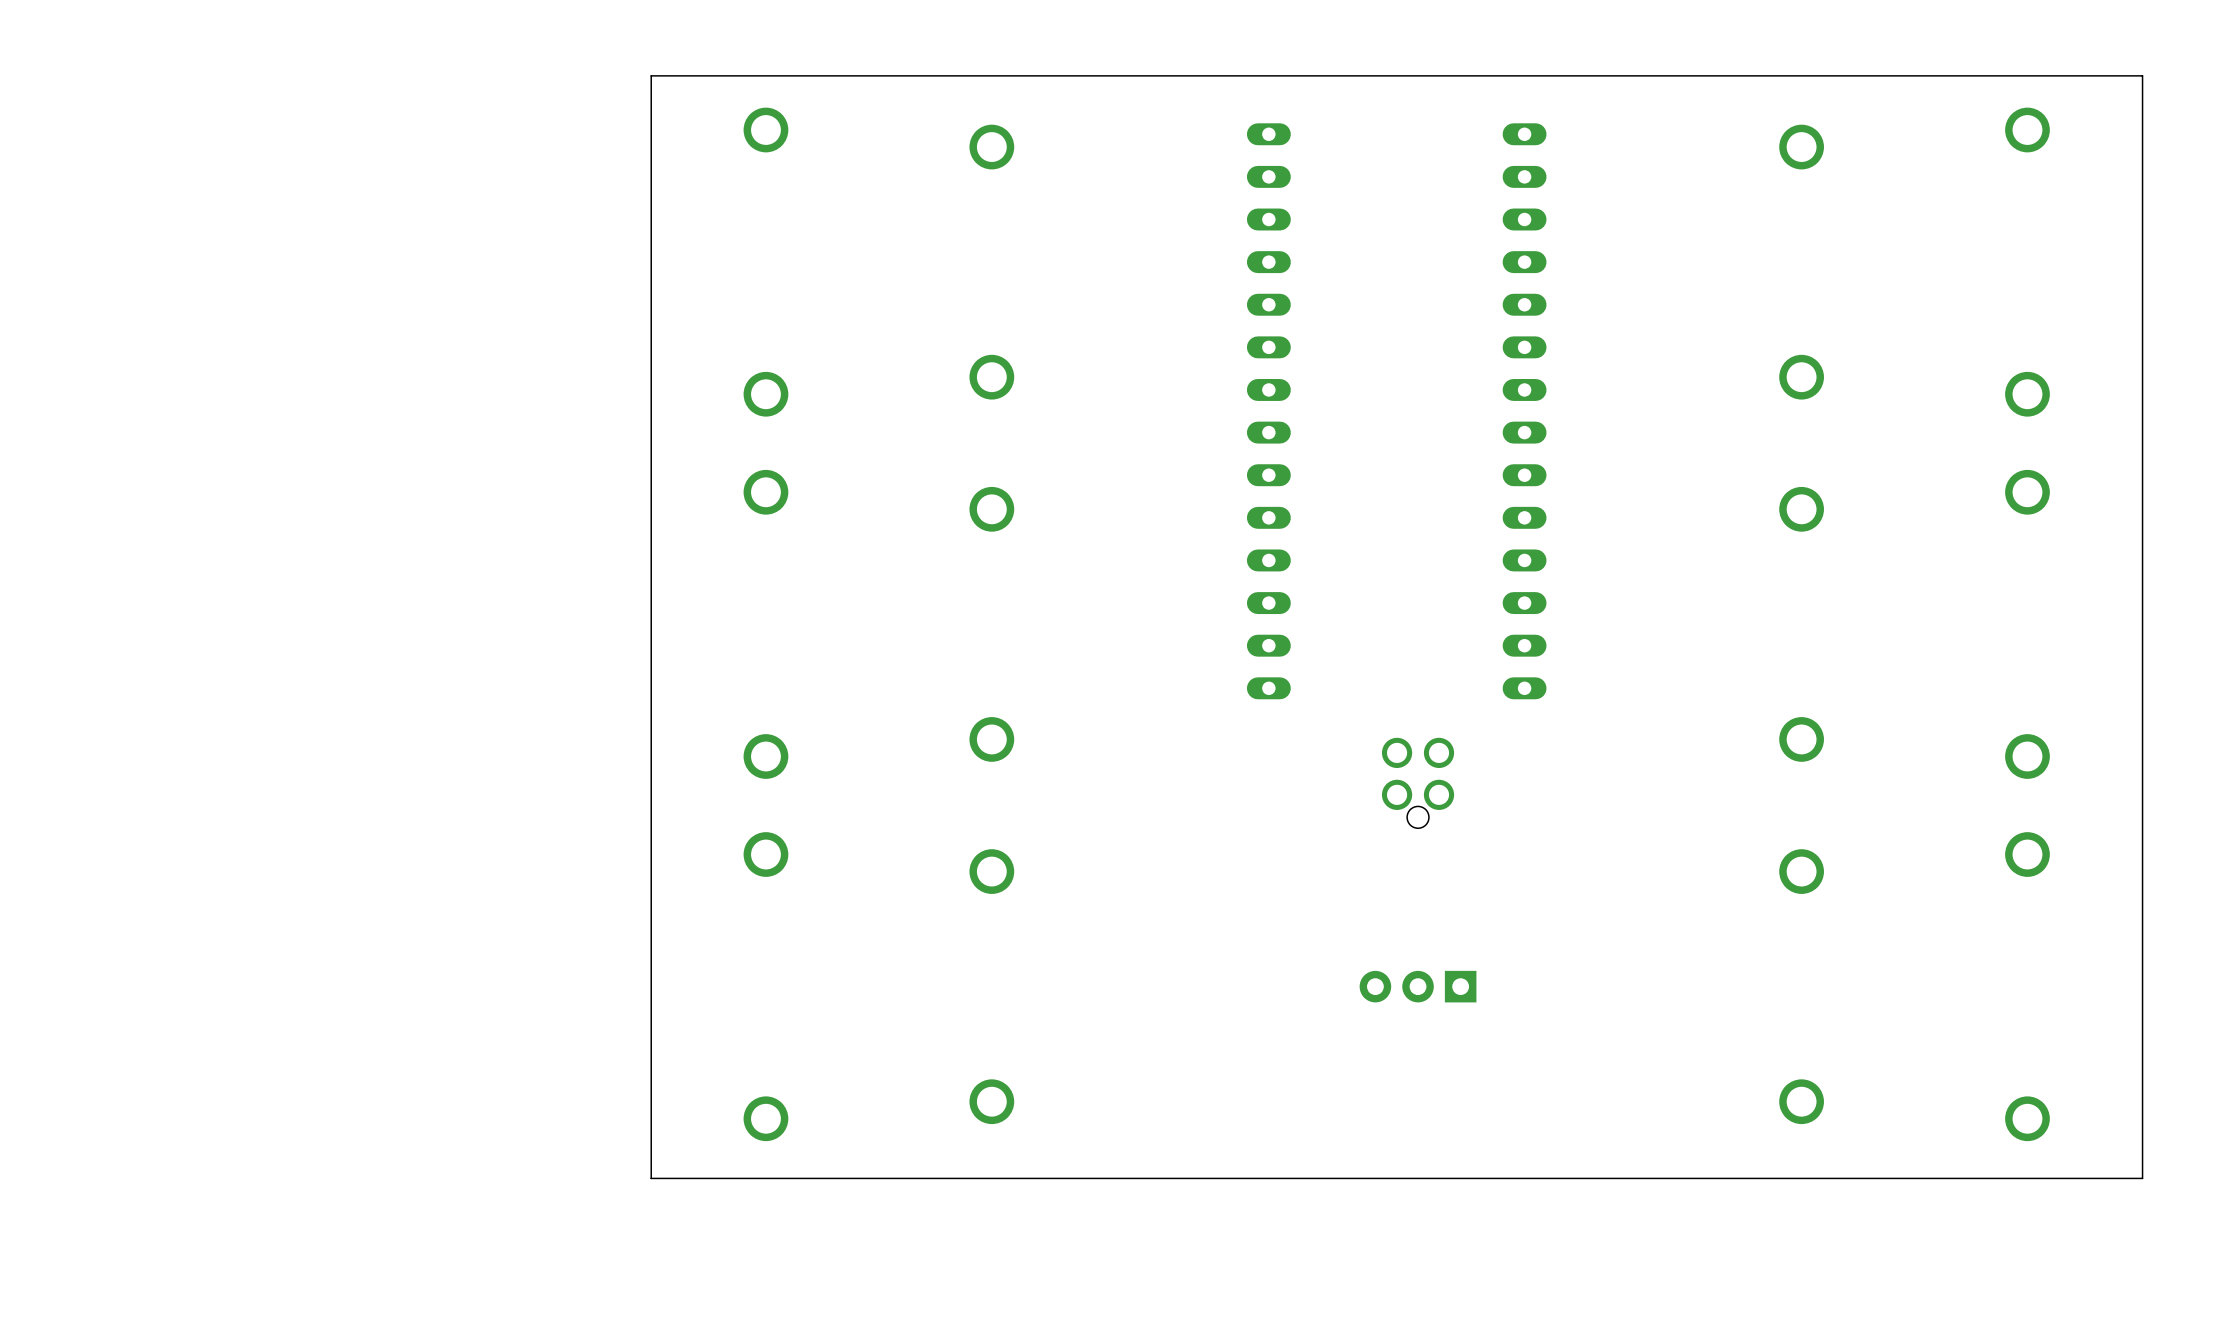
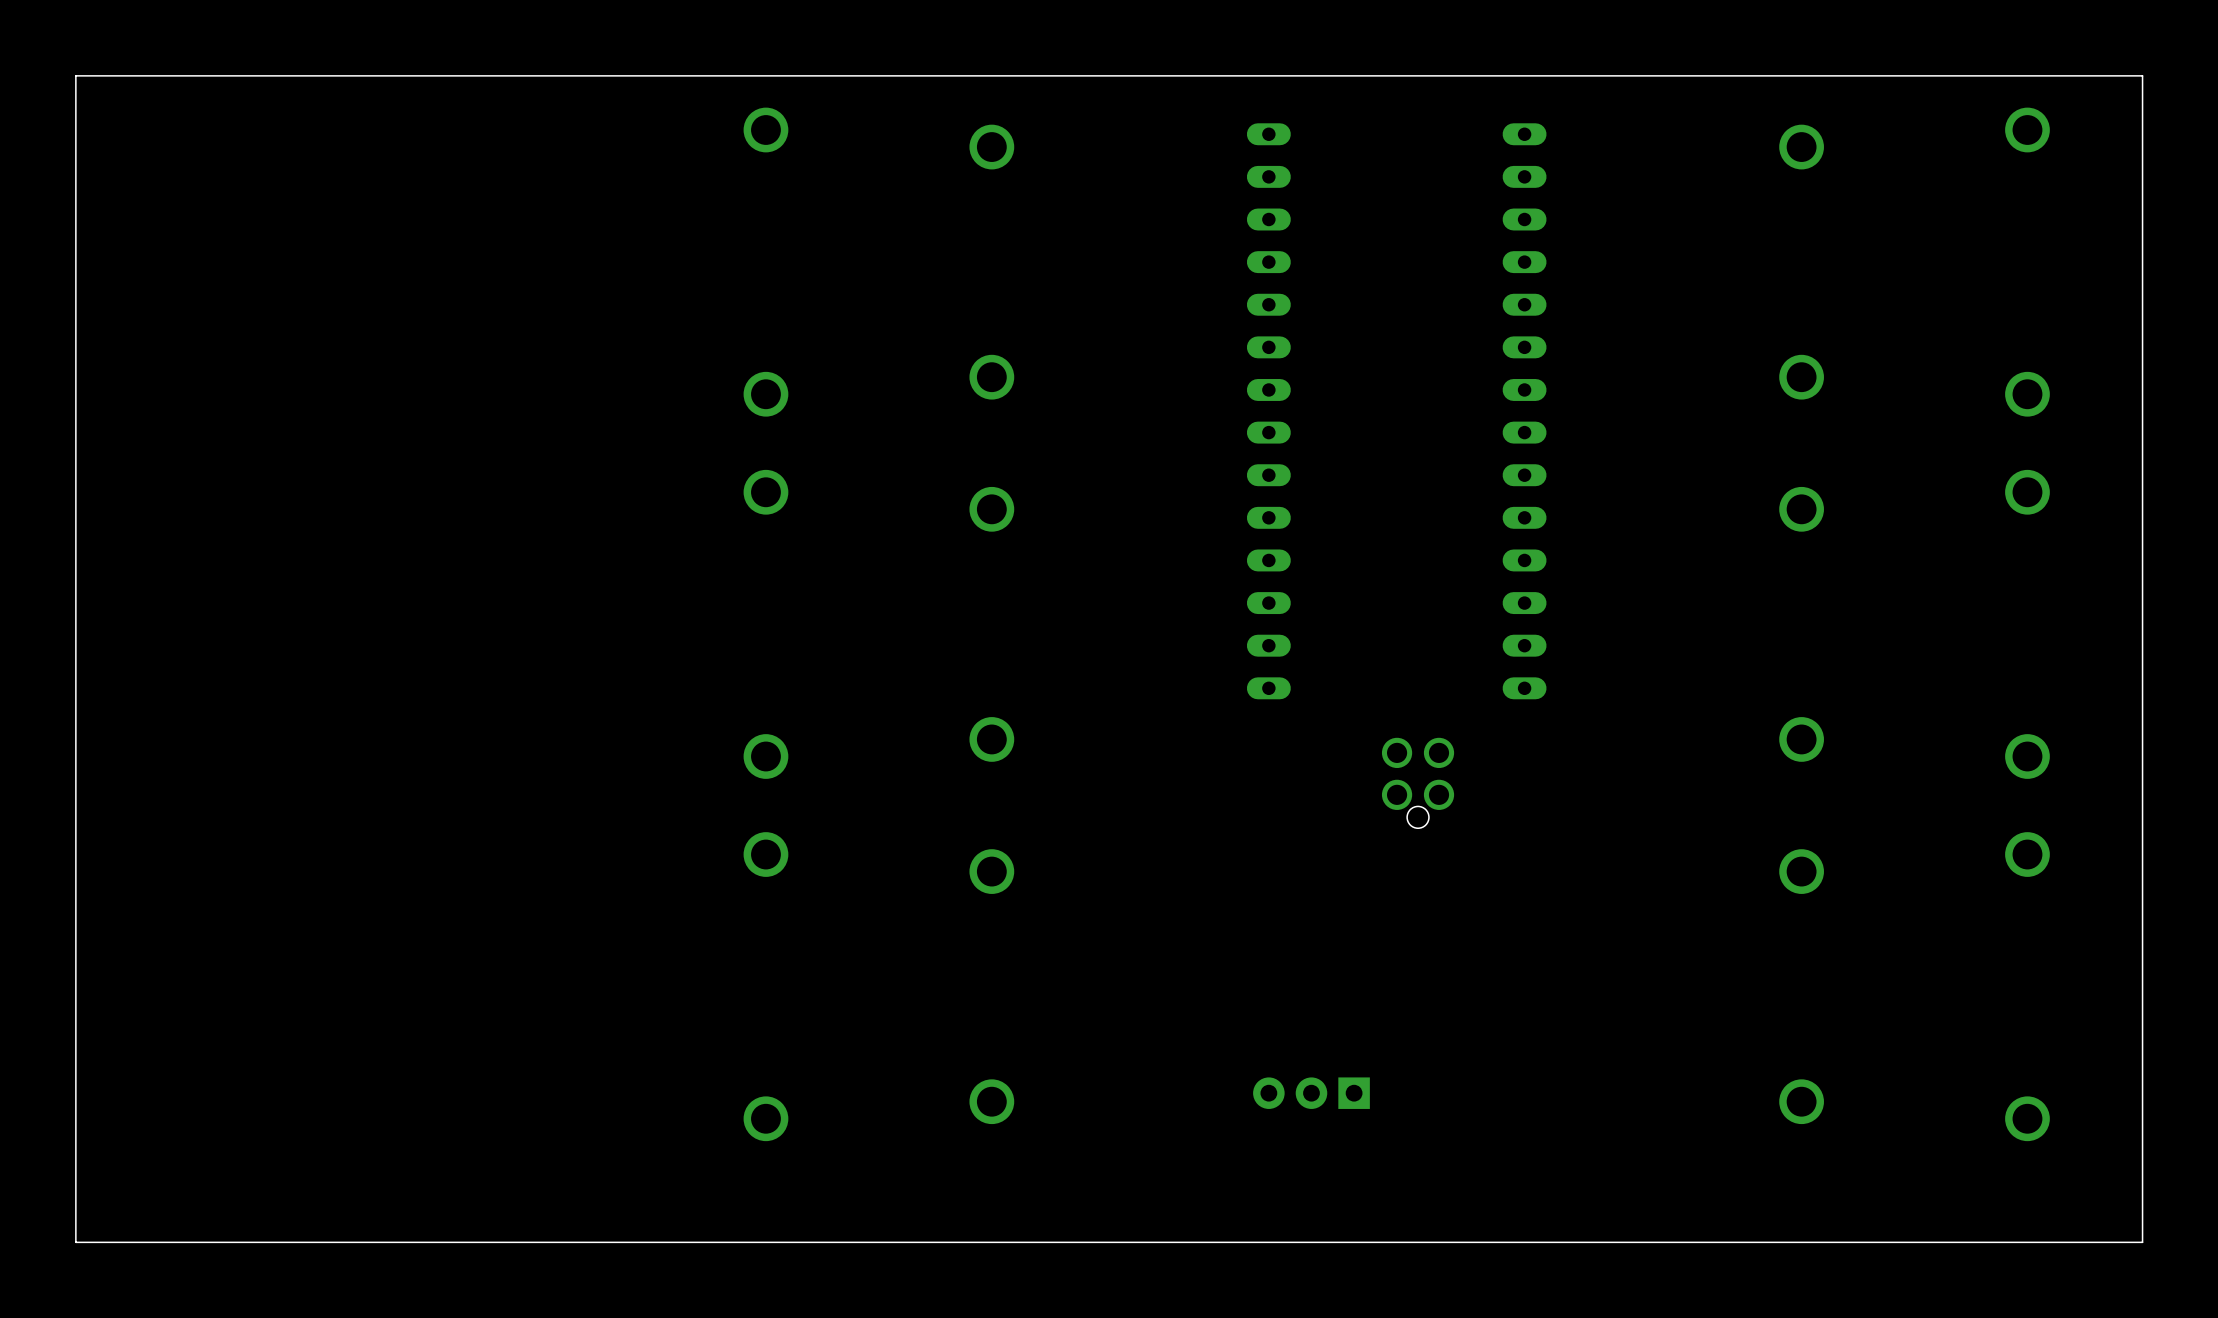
board edge: (651, 75) (651, 1178) (2142, 1178) -> (651, 75) (75, 75) (75, 1242) (2142, 1242) (2142, 1178)
part position: (1418, 986) -> (1311, 1093)

